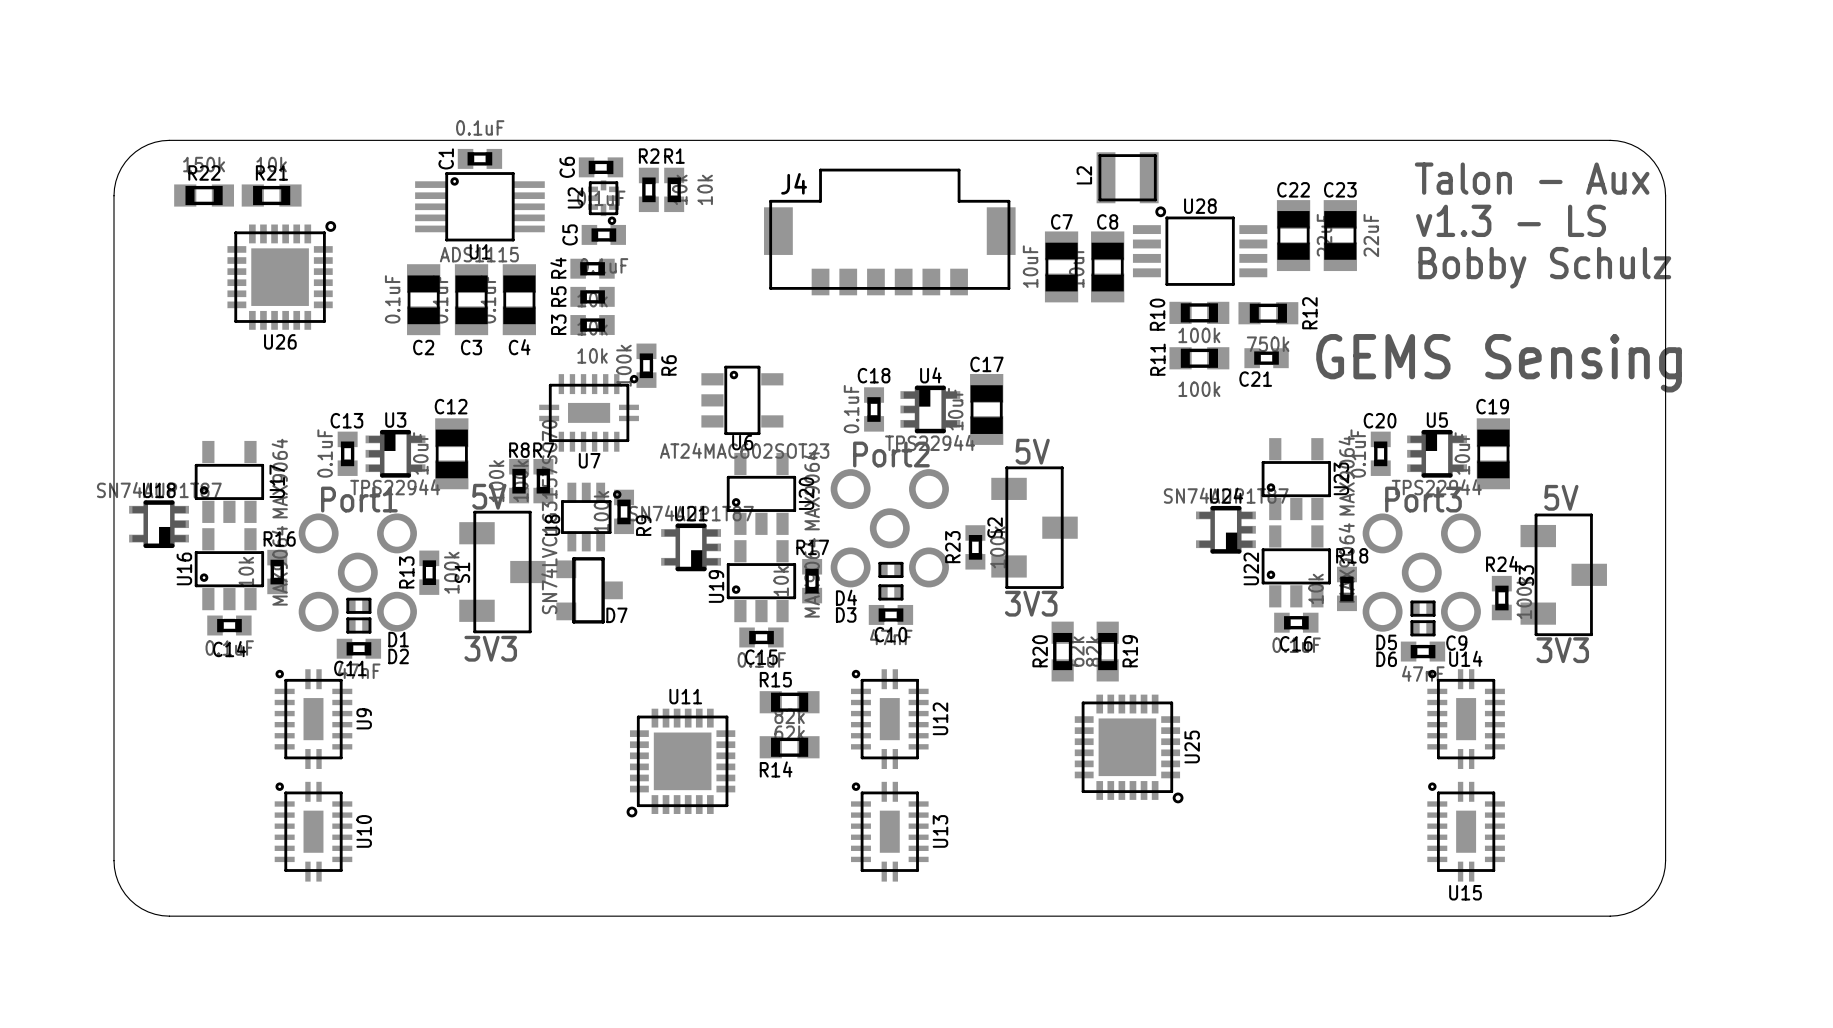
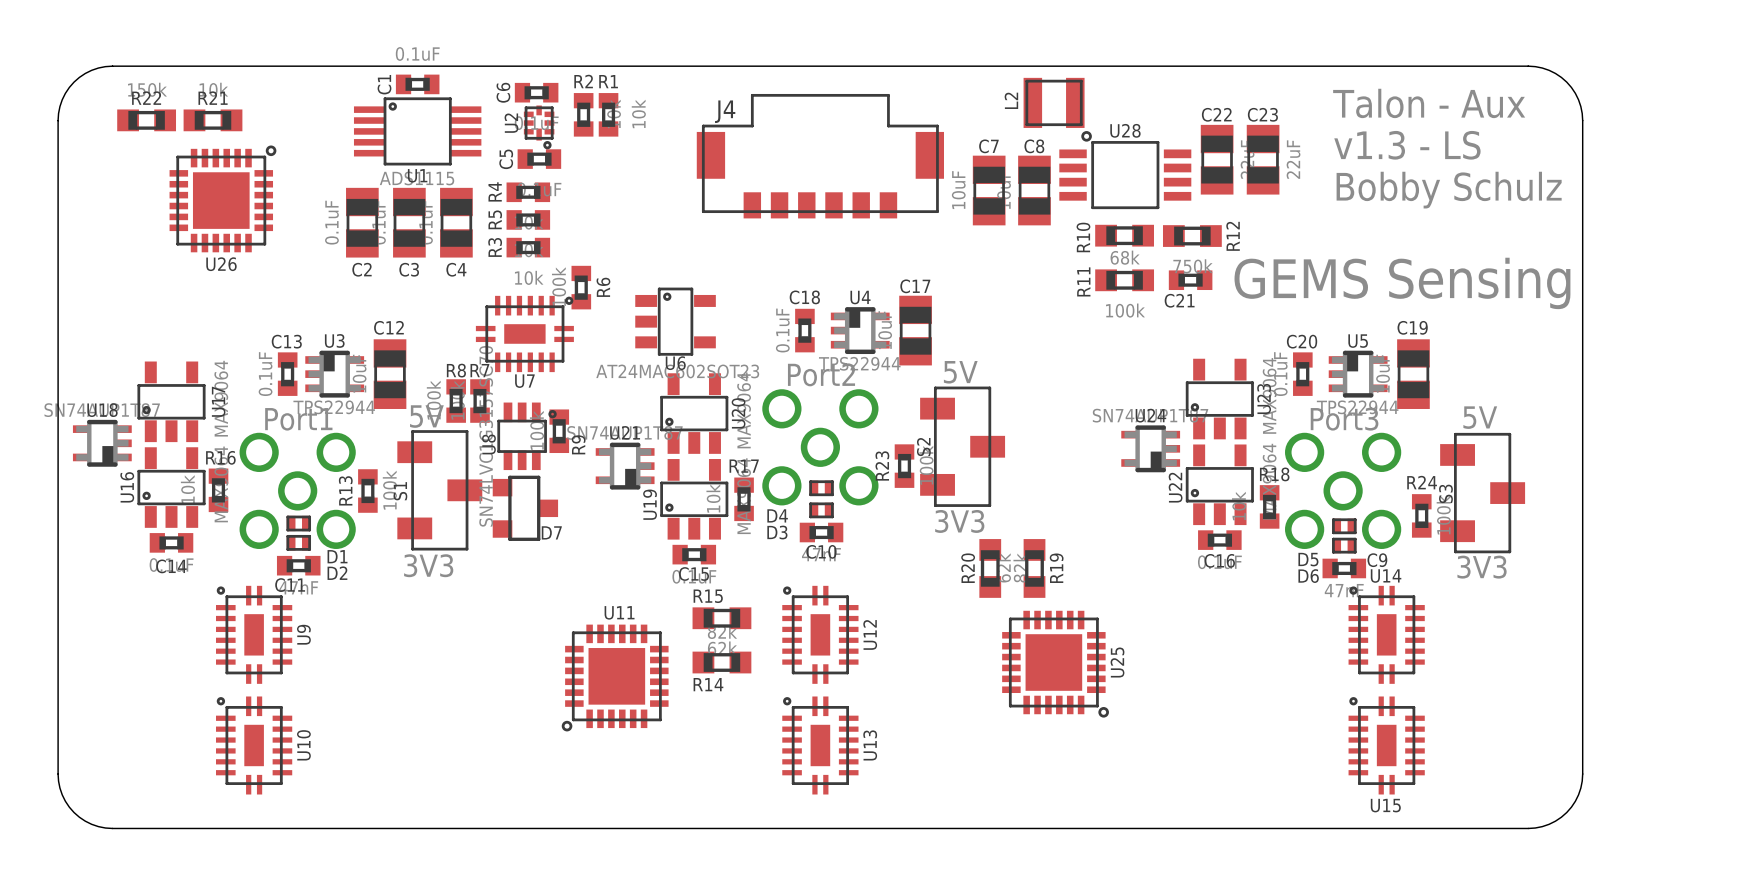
R10 value: 100k (1199, 335) -> 68k (1125, 257)

